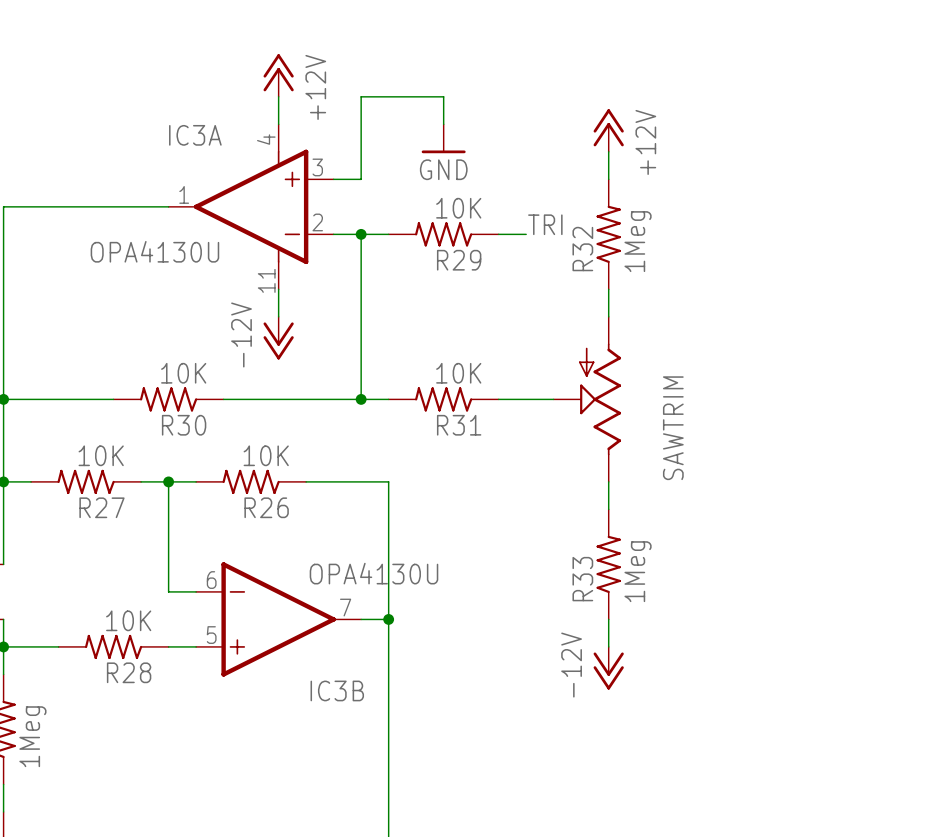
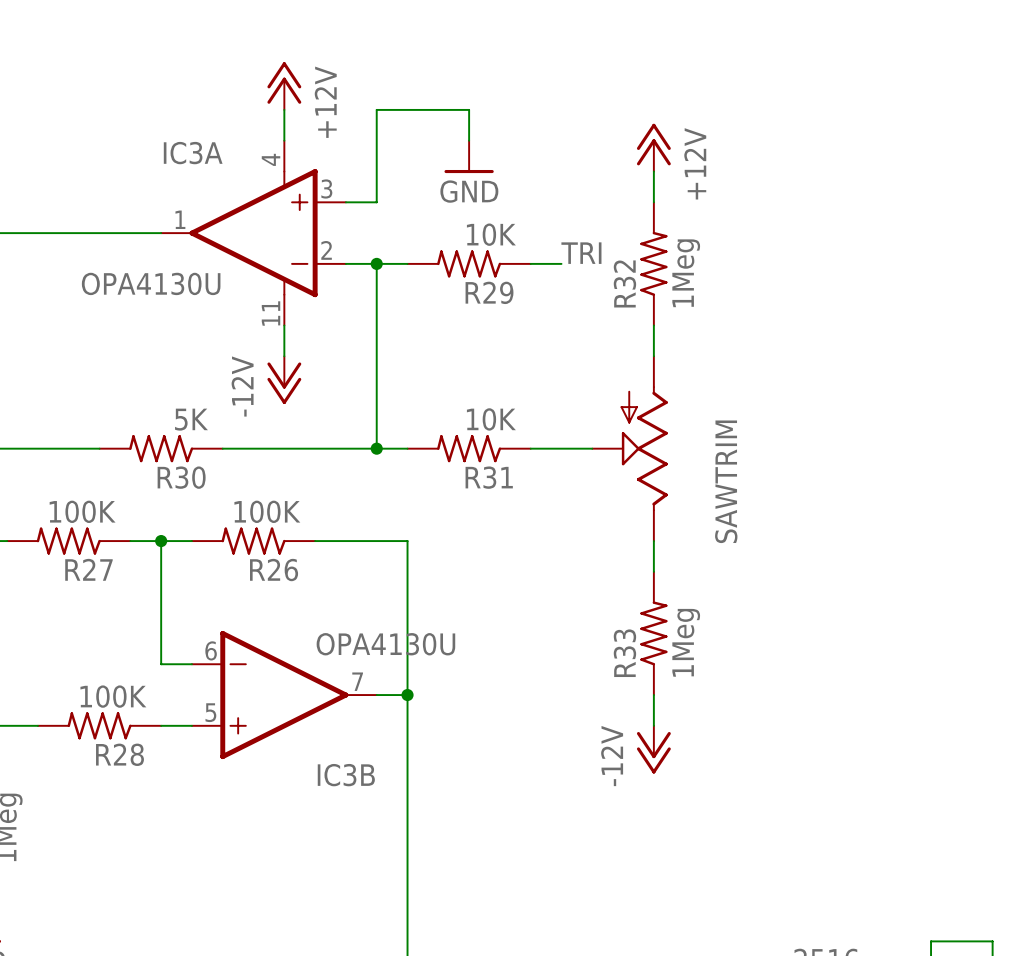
R30 value: 10K (183, 373) -> 5K (191, 419)
R27 value: 10K (101, 455) -> 100K (82, 511)
R26 value: 10K (266, 455) -> 100K (267, 511)
R28 value: 10K (128, 620) -> 100K (113, 696)

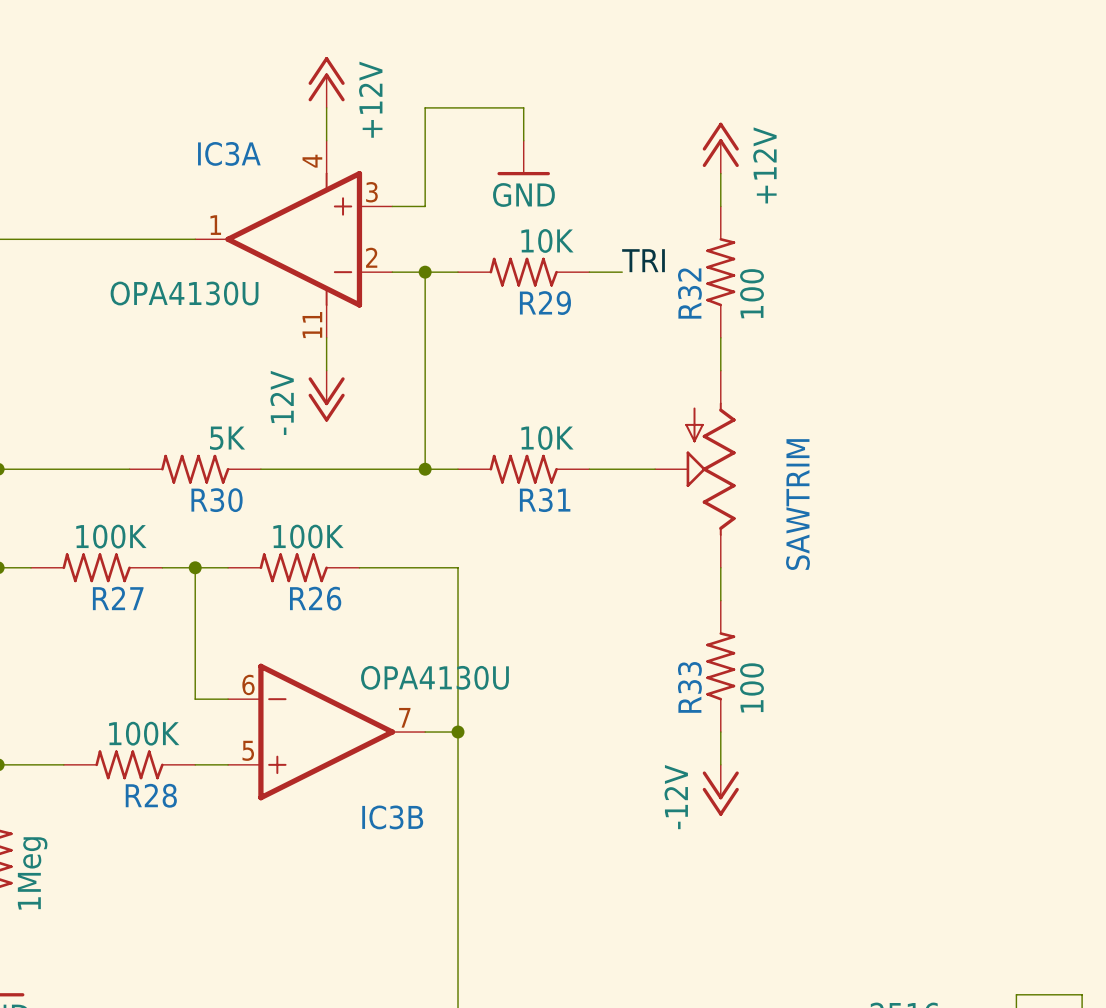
R32 value: 1Meg (686, 273) -> 100 (752, 293)
R33 value: 1Meg (686, 642) -> 100 (752, 687)

